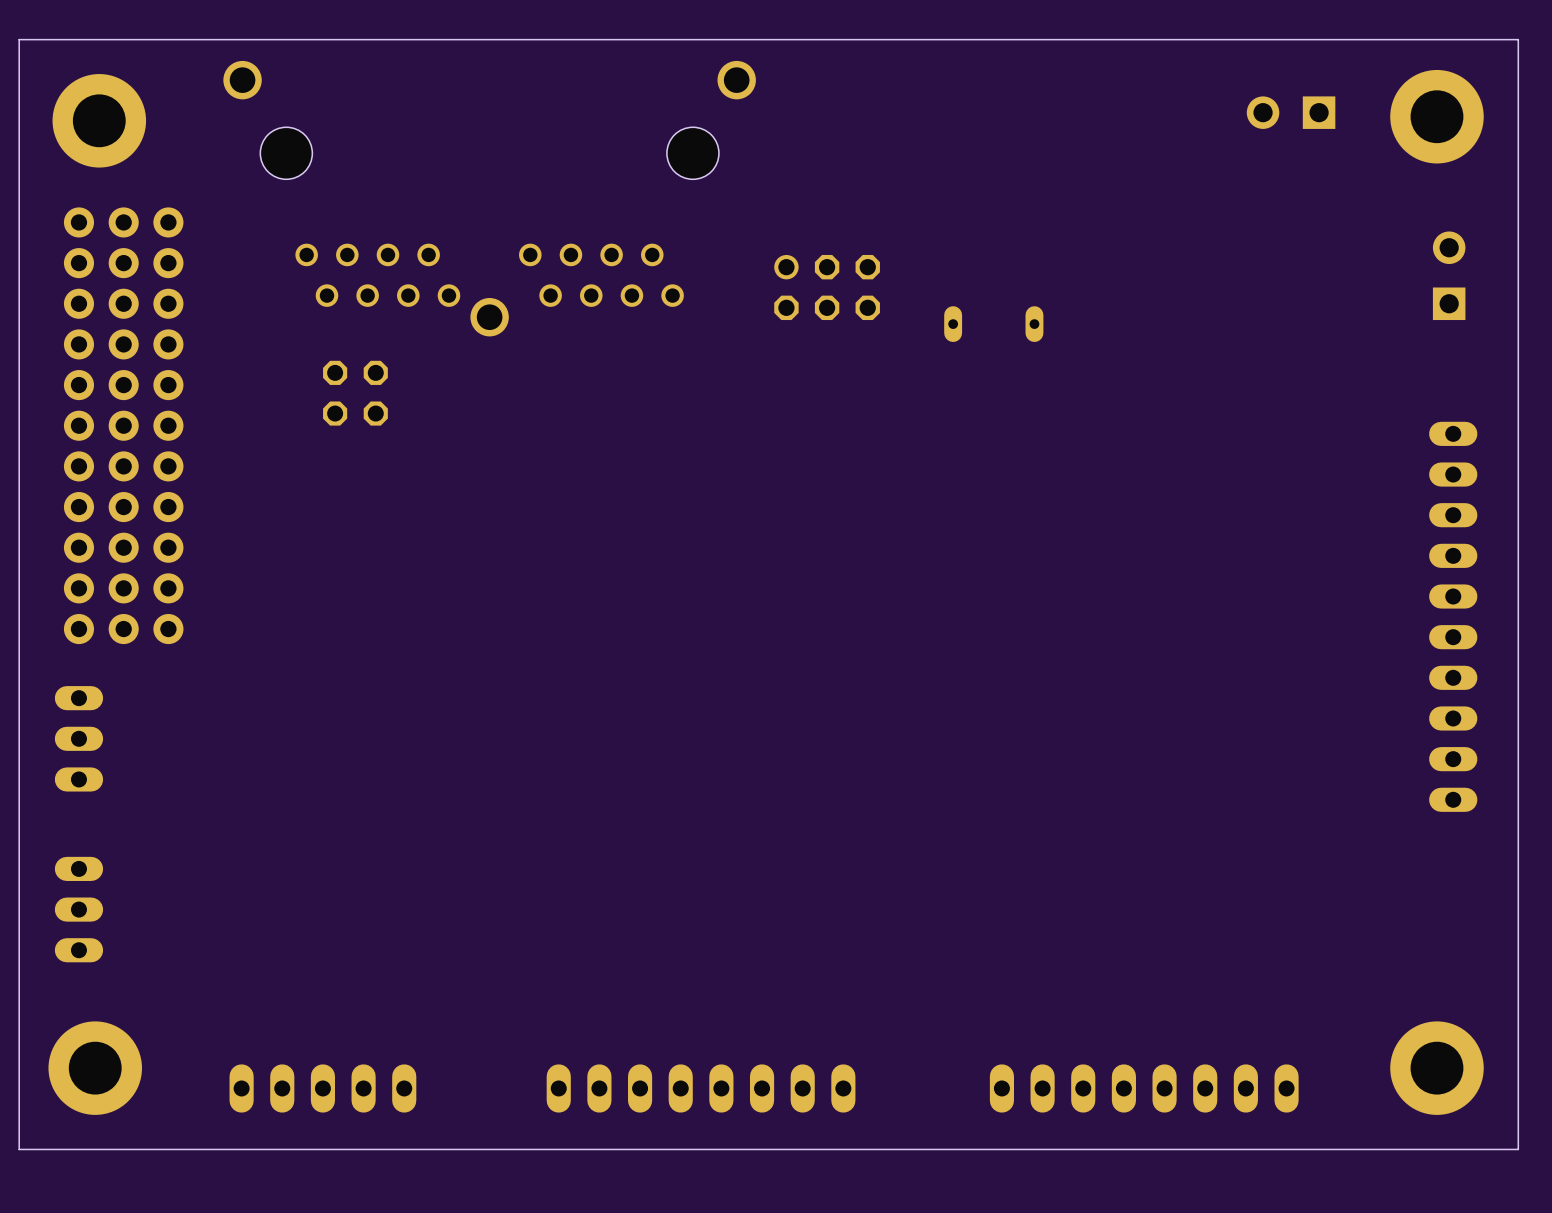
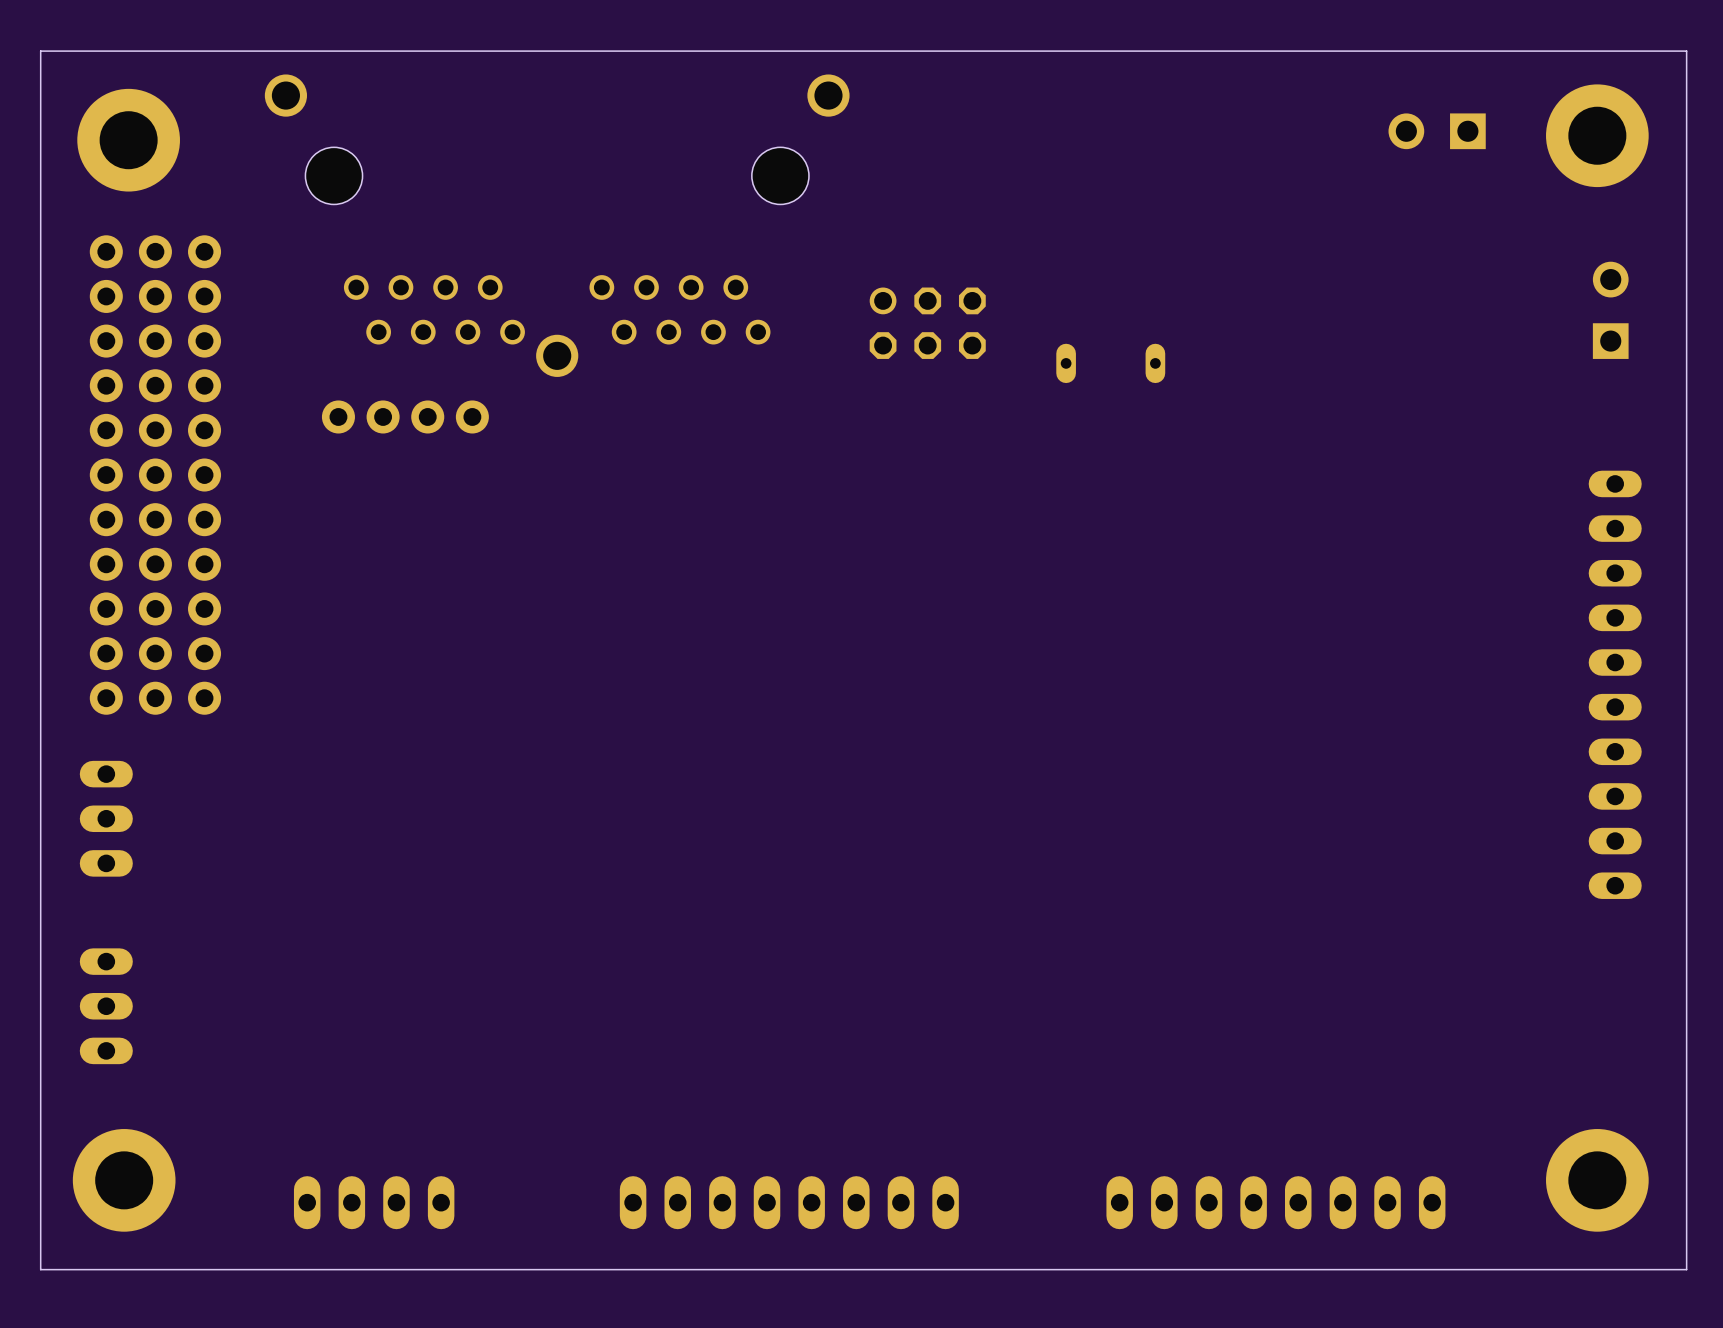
part: none -> (405, 416)
part: (355, 393) -> none
part footprint: [229, 1064, 417, 1113] -> [293, 1176, 455, 1230]

